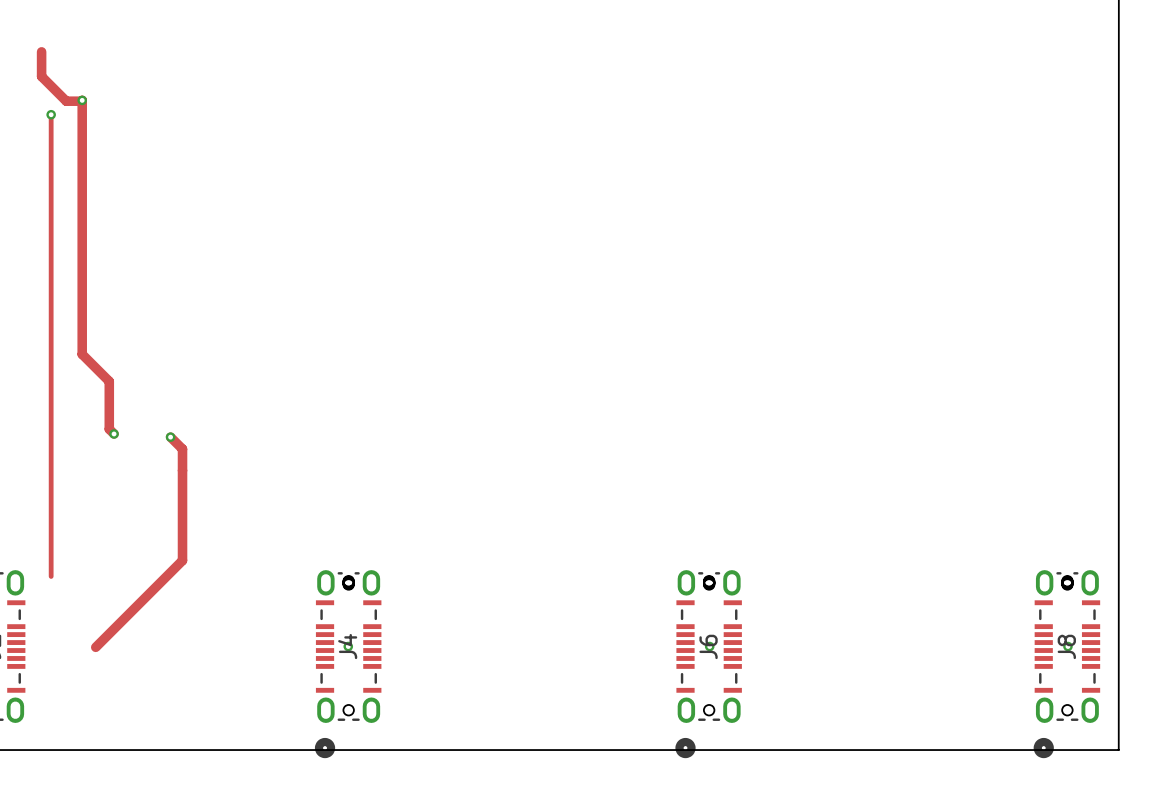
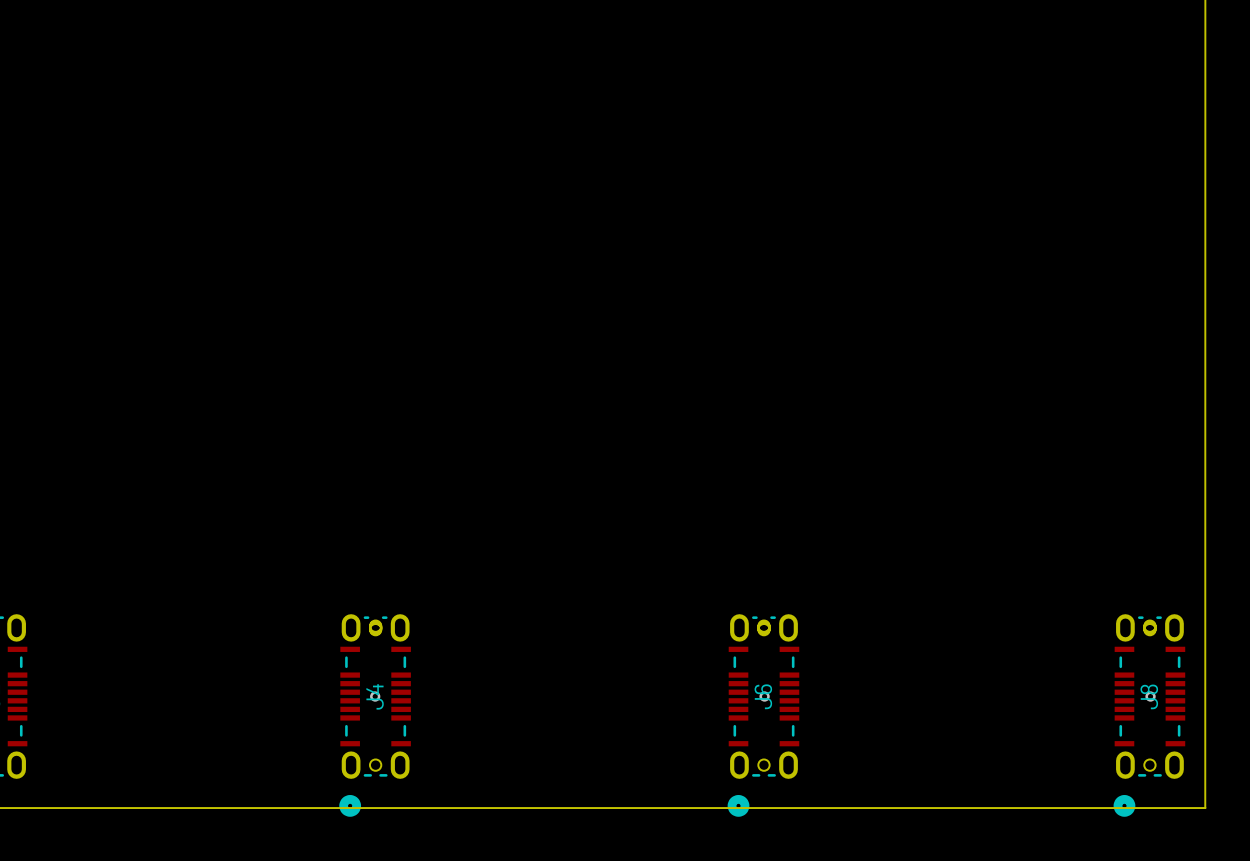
track: (41, 51) (41, 76) (66, 101) (82, 100) (82, 354) (109, 381) (109, 429) (114, 433) -> none
via: (82, 100) -> none
track: (51, 114) (51, 576) -> none
via: (51, 114) -> none
via: (114, 433) -> none
track: (170, 437) (182, 449) (182, 560) (95, 647) -> none
via: (170, 437) -> none

